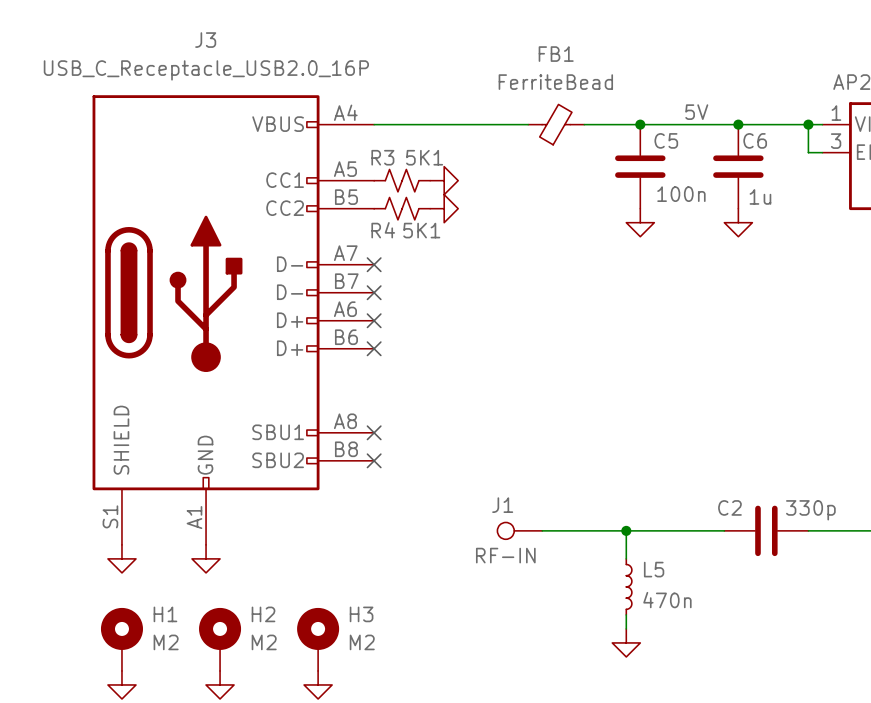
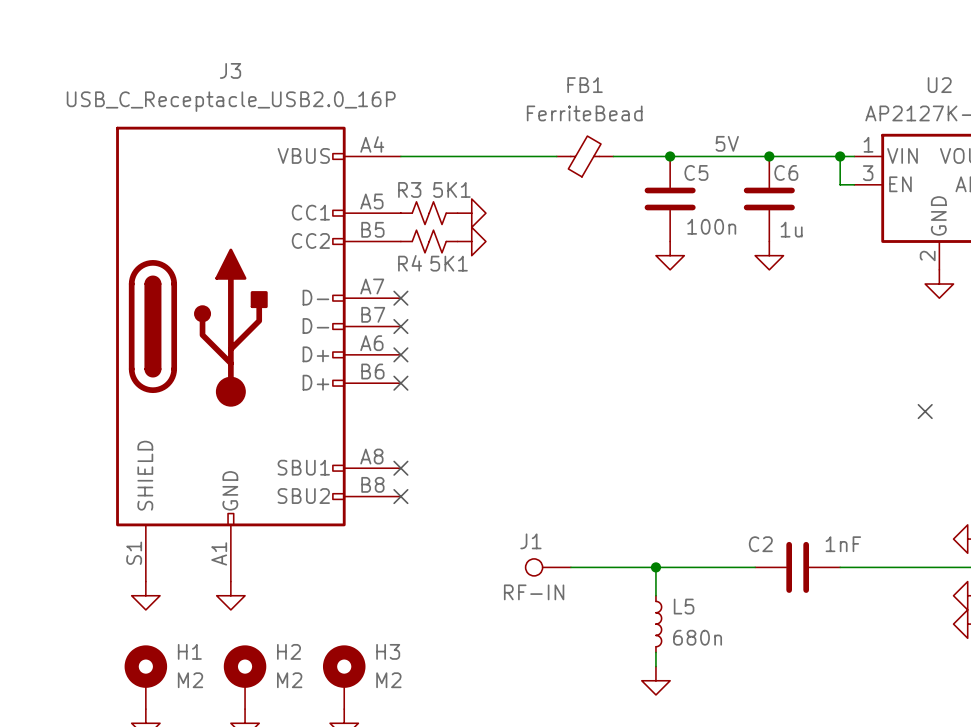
C2 value: 330p (810, 510) -> 1nF (843, 544)
L5 value: 470n (667, 600) -> 680n (697, 637)

